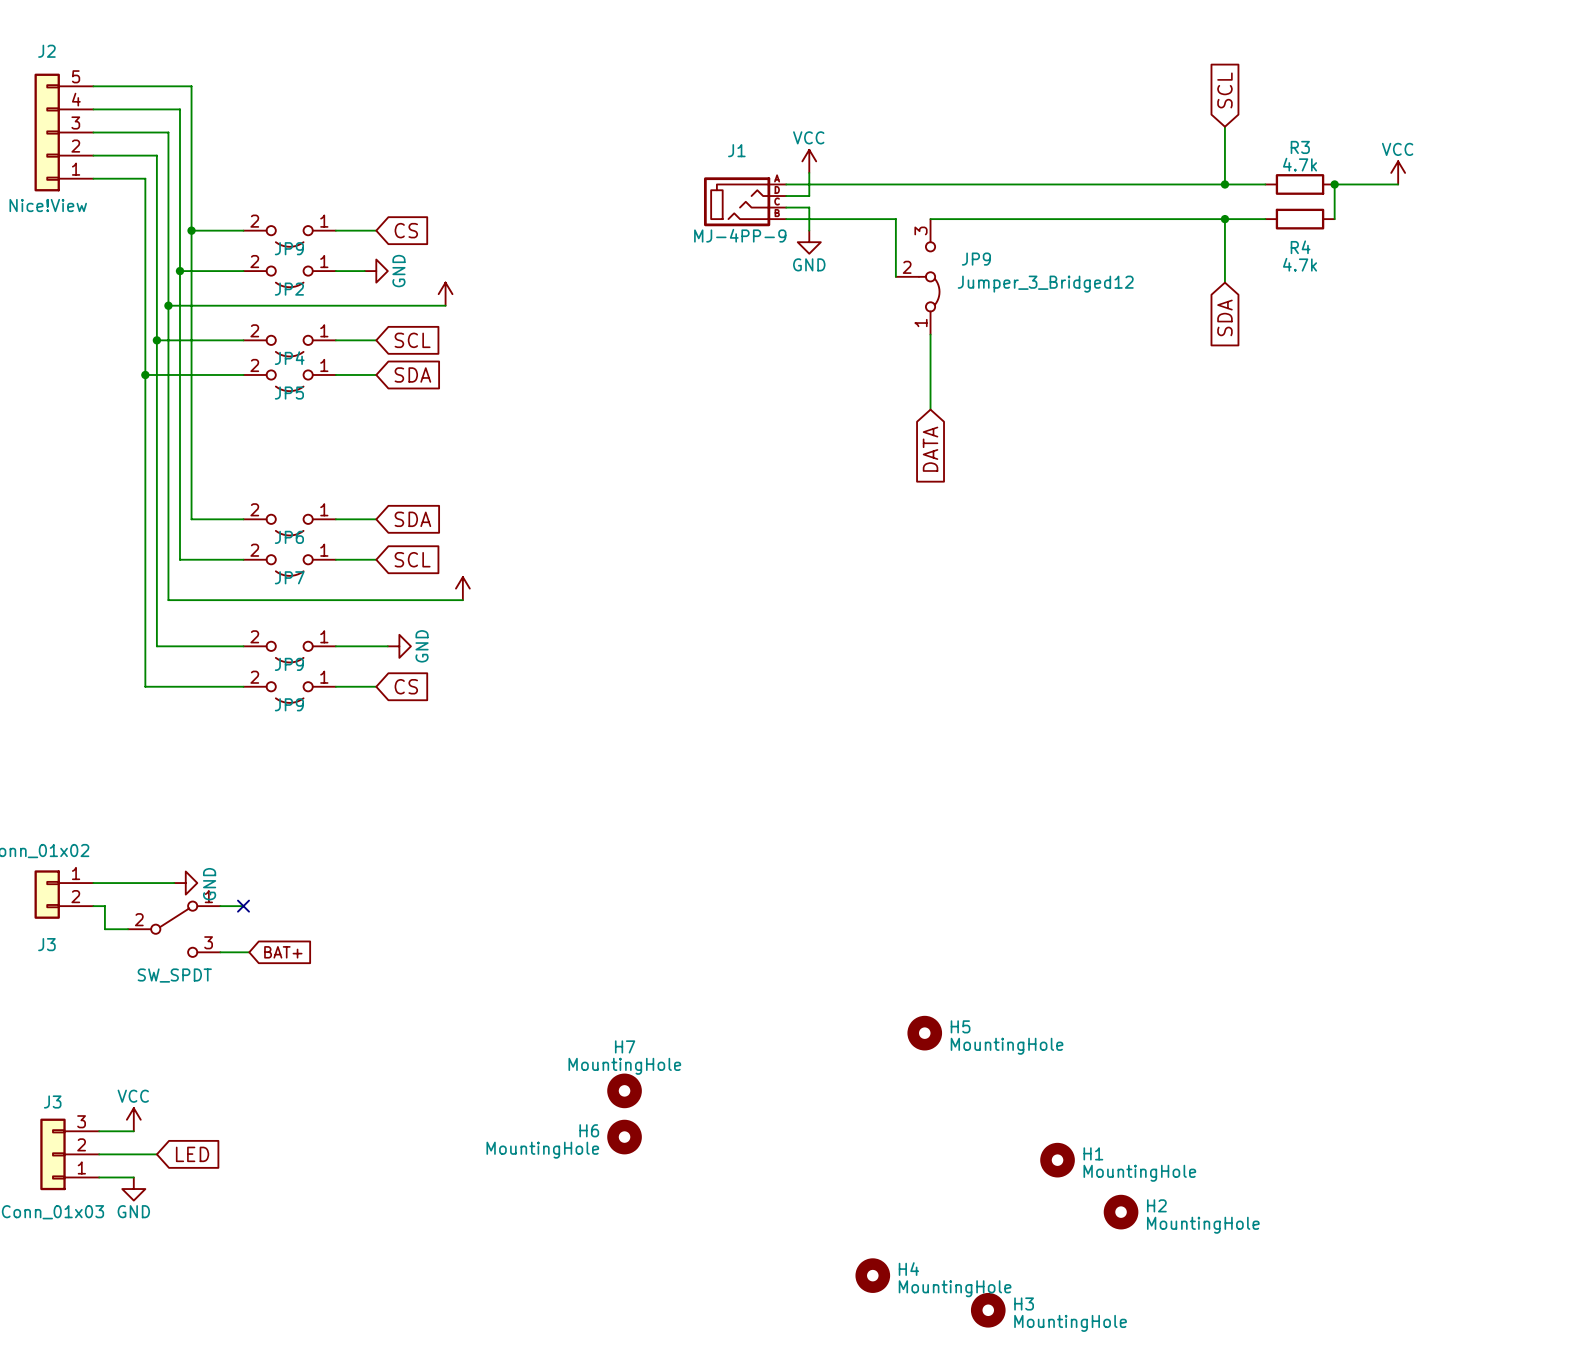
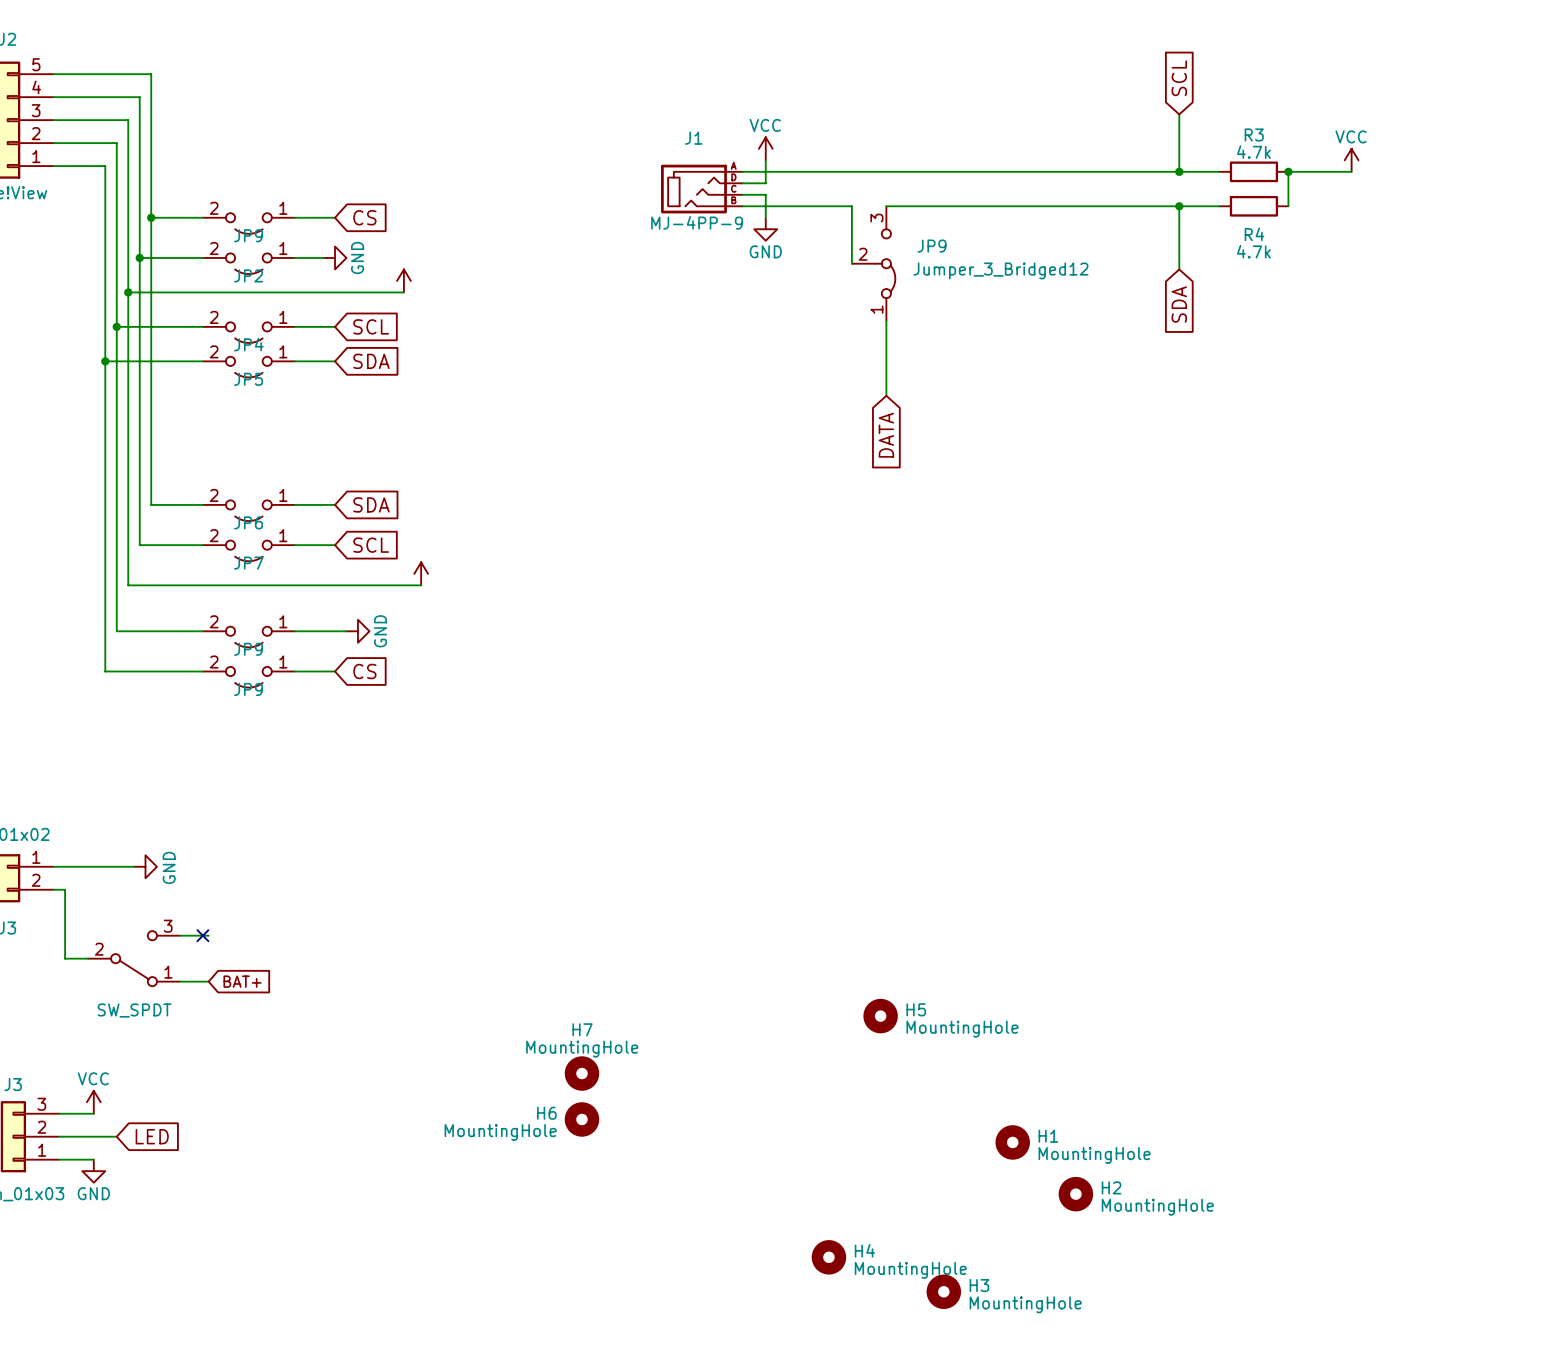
wire: (220, 906) (243, 906) -> none
no-connect mark position: (243, 906) -> (202, 935)
wire: (104, 929) (128, 929) -> (65, 912) (65, 958) (88, 958)
part: SW_SPDT (174, 929) -> none
global label position: BAT+ (283, 952) -> BAT+ (242, 981)
part: none -> SW_SPDT (134, 958)
wire: none -> (179, 981) (208, 981)

